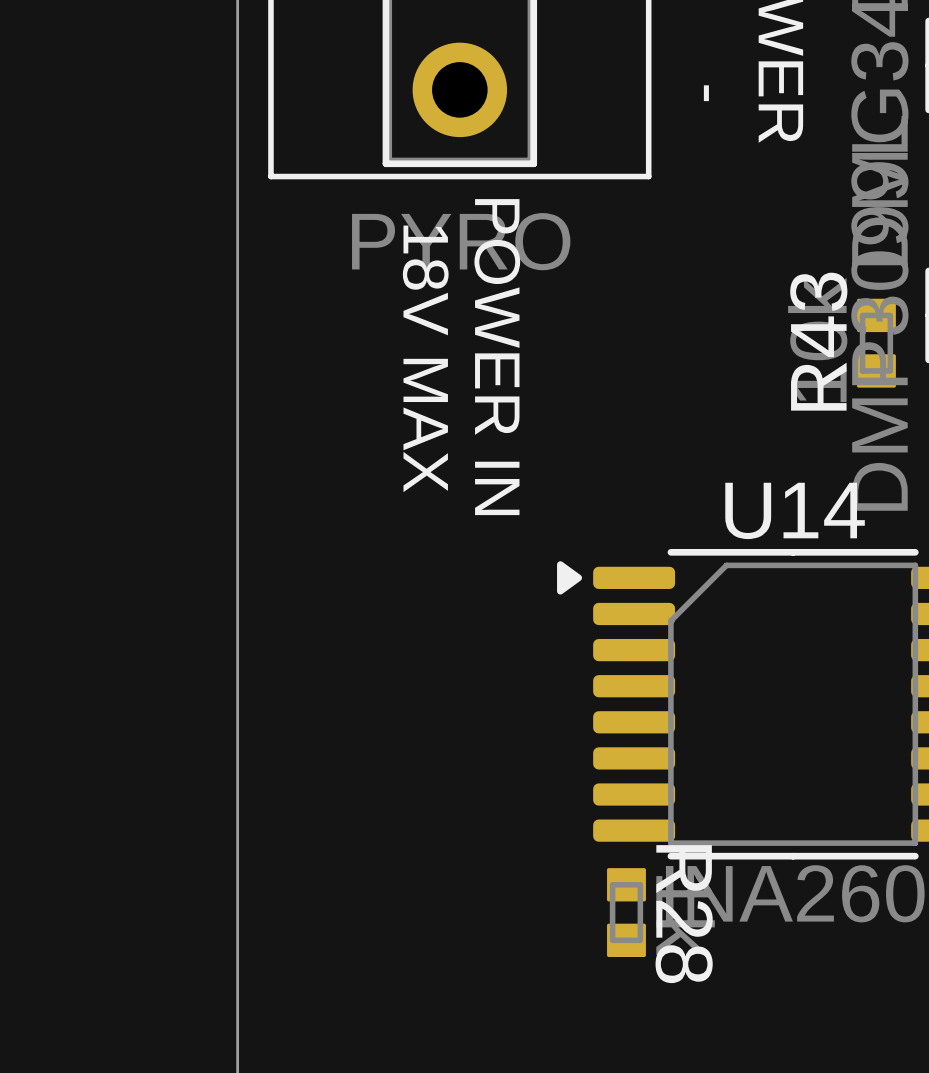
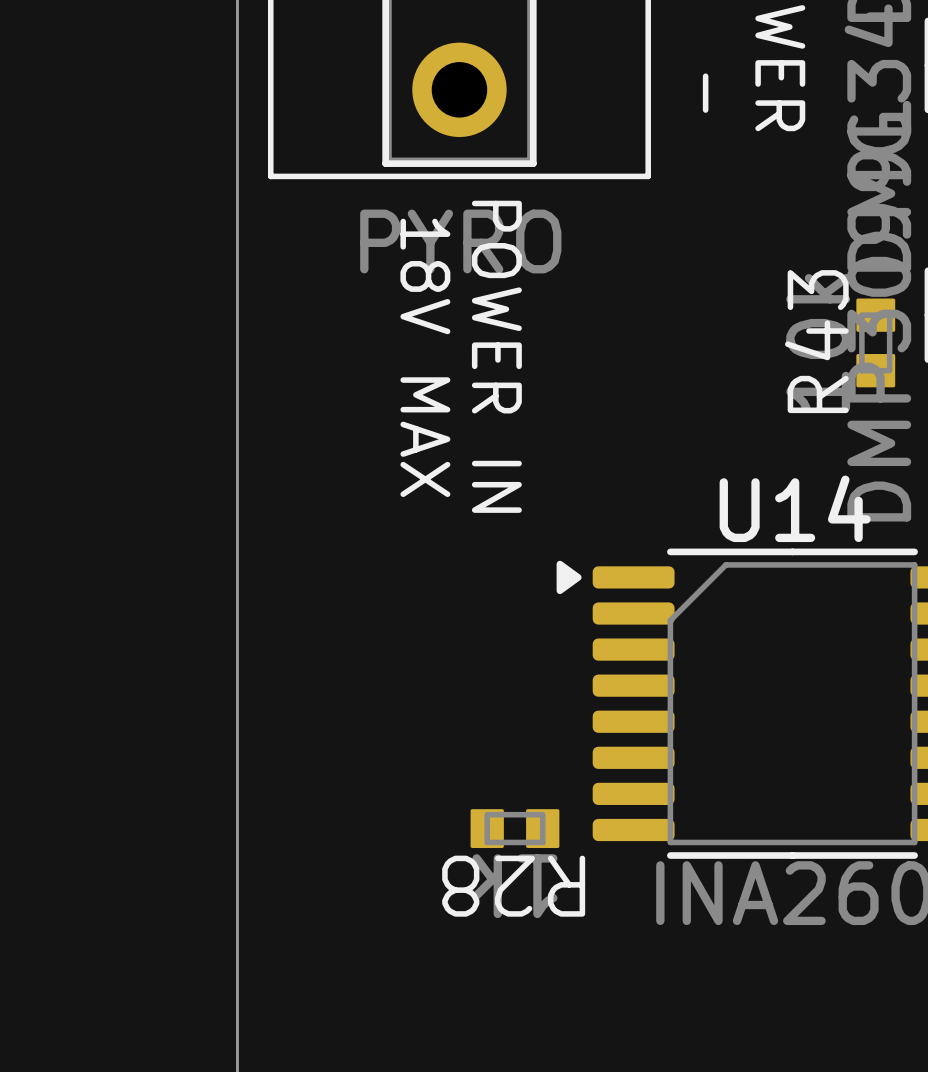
R28 rotation: 0° (626, 912) -> 90° clockwise (514, 828)
R28 position: (626, 912) -> (514, 828)

